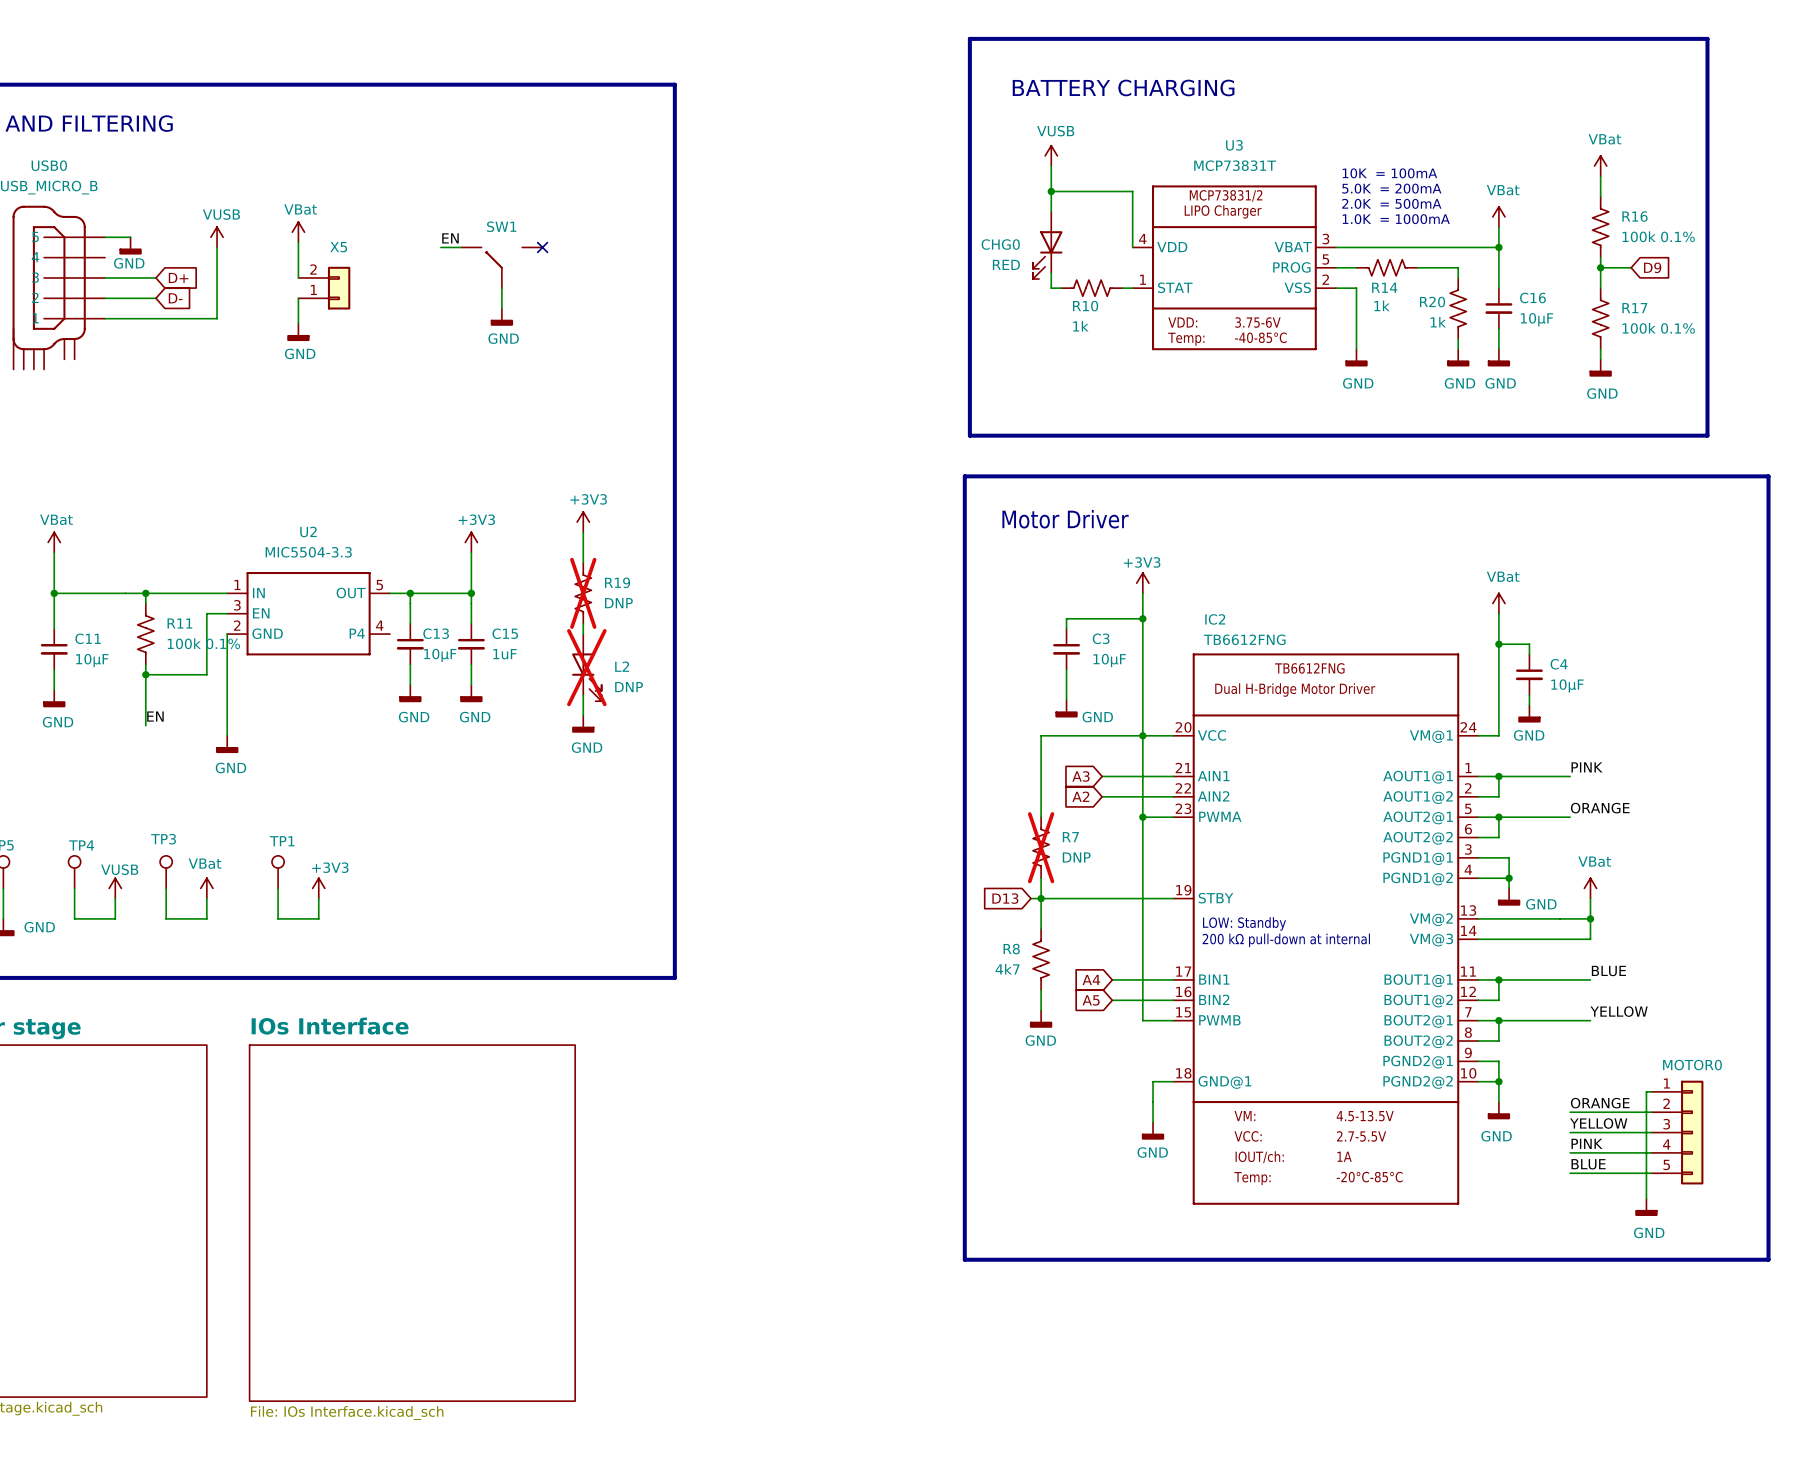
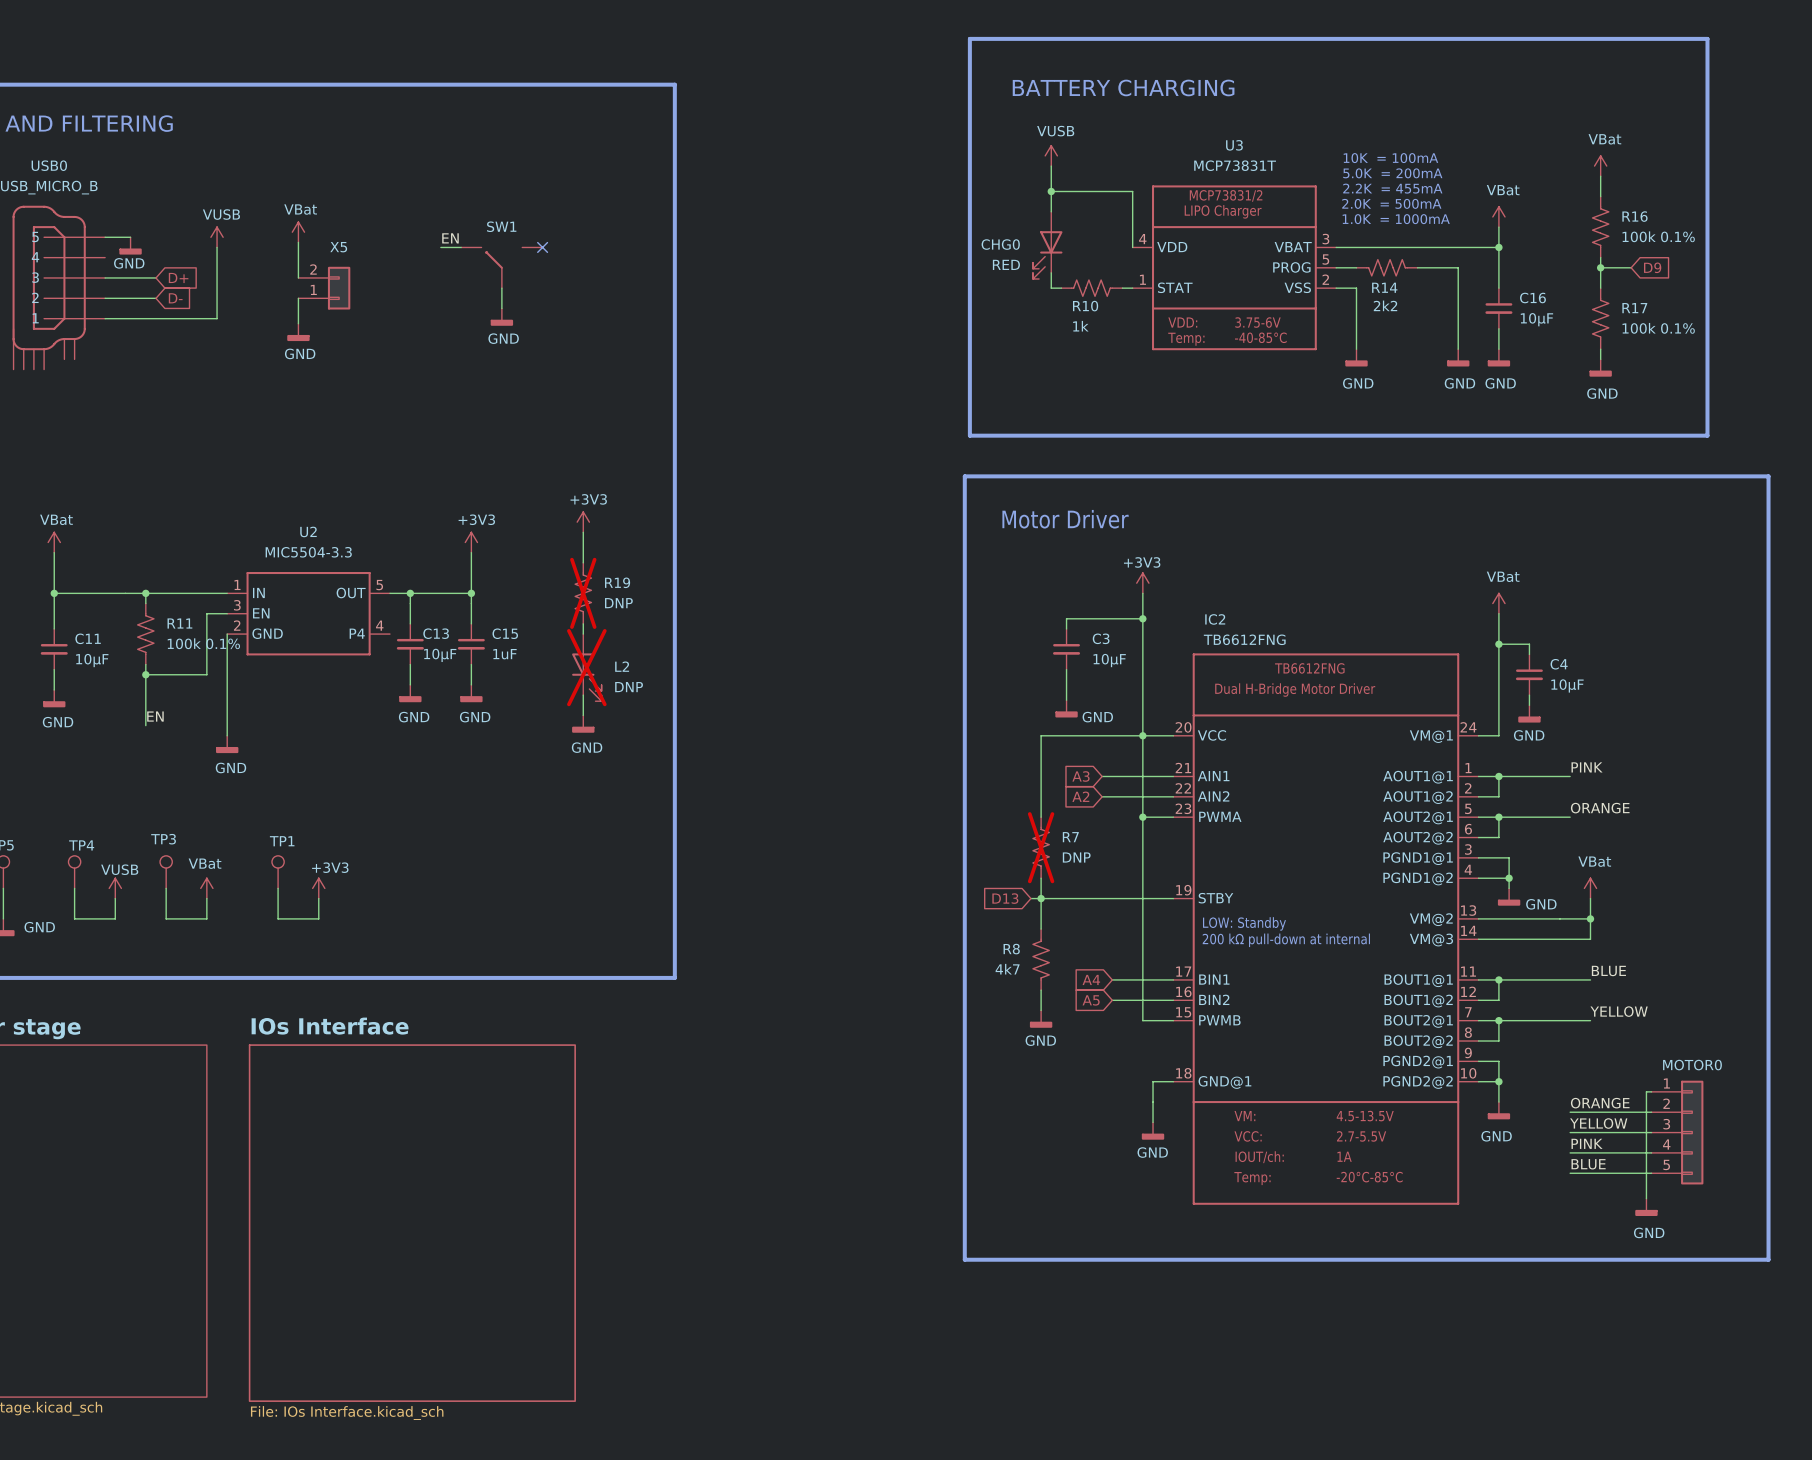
text: none -> 10K = 100mA (1390, 158)
text: 10K = 100mA (1389, 173) -> 5.0K = 200mA (1392, 173)
text: 5.0K = 200mA (1391, 188) -> 2.2K = 455mA (1392, 188)
R14 value: 1k (1381, 305) -> 2k2 (1385, 305)
R20: 1k (1458, 308) -> none

